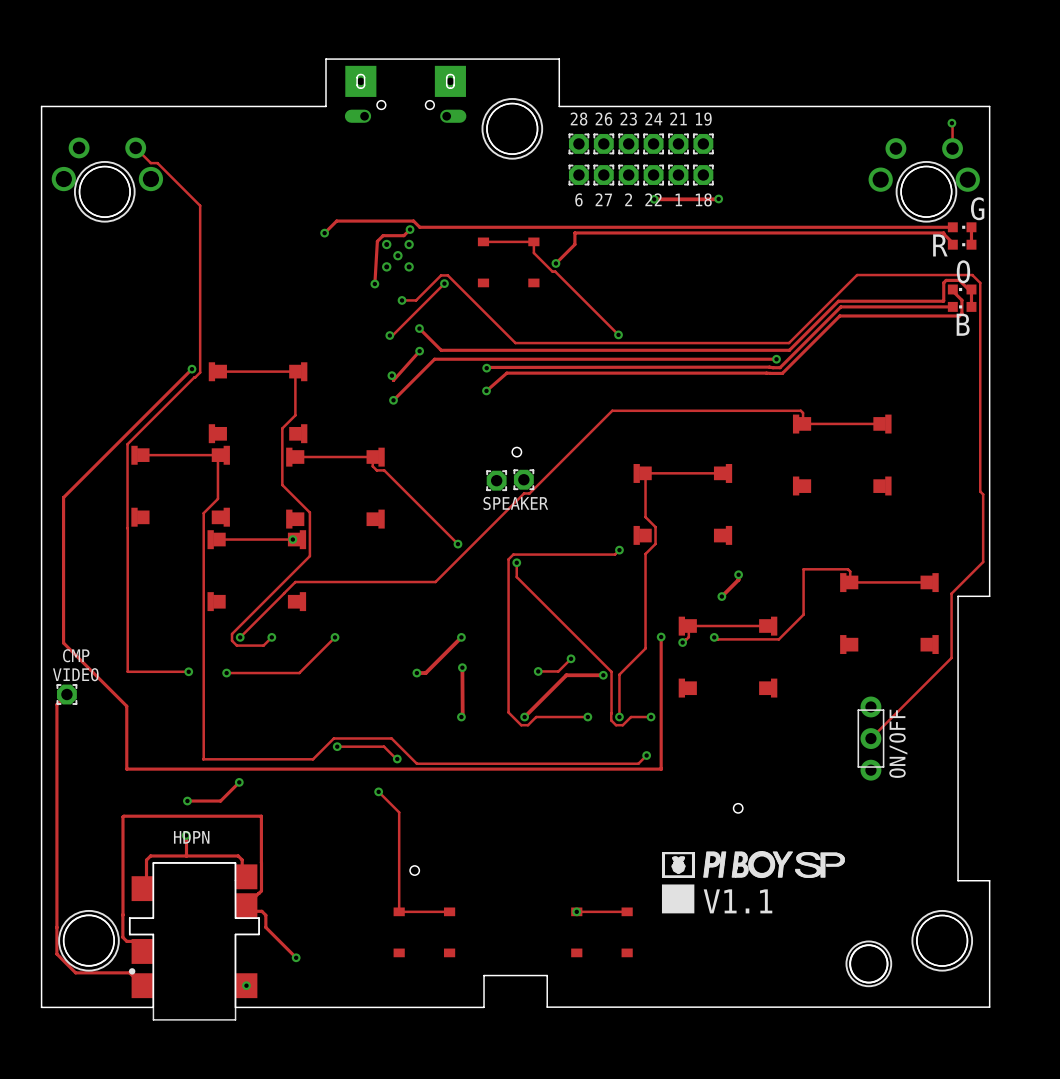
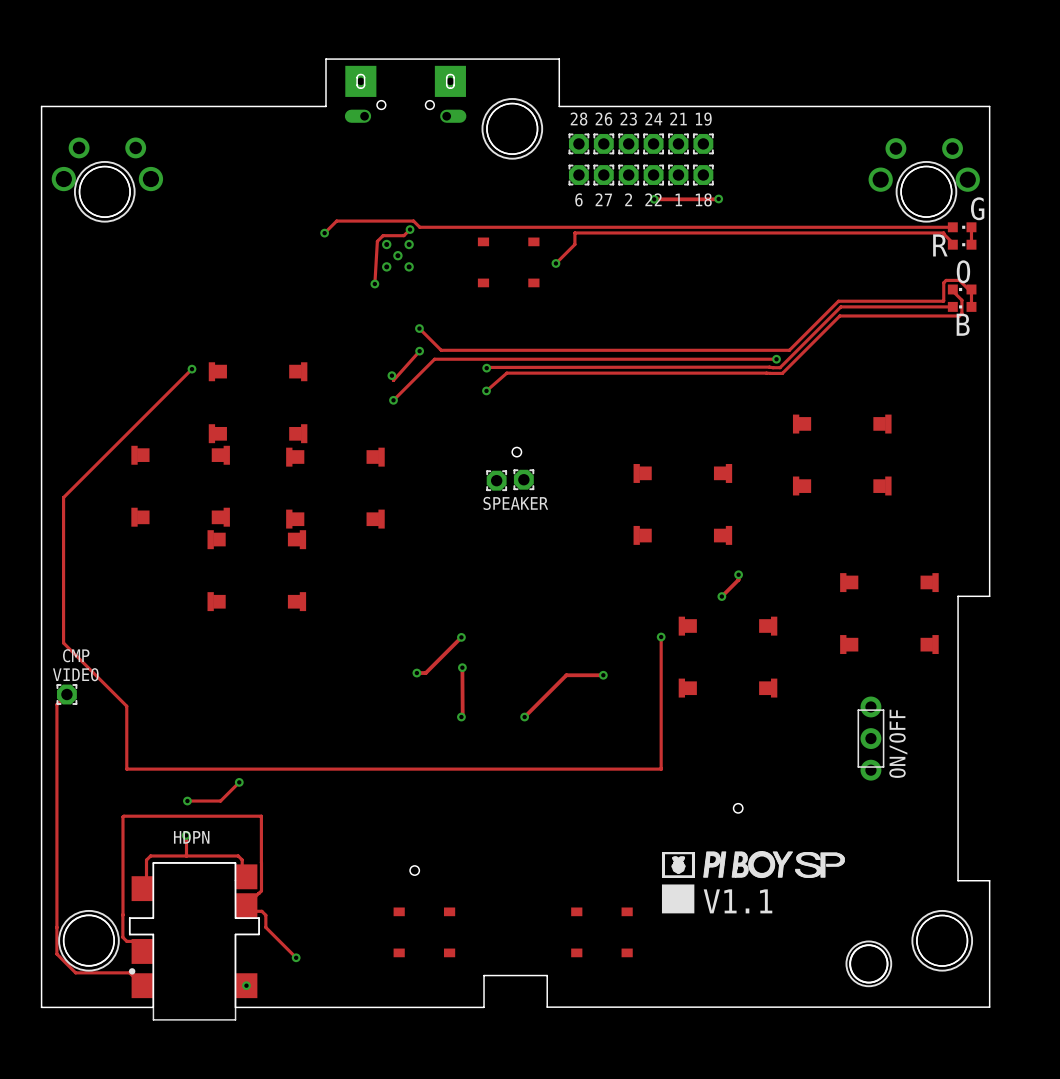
track: (951, 123) (952, 148) -> none
via: (951, 123) -> none
track: (135, 147) (150, 163) (157, 163) (200, 205) (200, 372) (127, 444) (127, 671) (188, 671) -> none
track: (483, 241) (533, 241) (533, 252) (618, 334) -> none
track: (444, 283) (392, 335) (389, 335) -> none
via: (444, 283) -> none
track: (402, 300) (416, 300) (441, 275) (447, 275) (515, 343) (789, 343) (857, 275) (972, 275) (980, 282) (980, 491) (983, 494) (983, 562) (951, 593) (951, 657) (870, 738) -> none
via: (402, 300) -> none
via: (618, 334) -> none
via: (389, 335) -> none
track: (220, 371) (295, 371) (295, 415) (282, 428) (282, 485) (309, 512) (309, 556) (232, 634) (232, 640) (236, 645) (263, 645) (271, 637) -> none
track: (879, 423) (804, 423) (800, 410) (612, 410) (529, 493) (524, 493) (435, 582) (295, 582) (284, 593) -> none
track: (143, 455) (217, 455) (217, 498) (203, 513) (203, 759) (313, 759) (333, 738) (391, 738) (416, 763) (638, 763) (646, 755) -> none
track: (298, 457) (372, 457) (372, 466) (376, 470) (384, 470) (457, 544) -> none
track: (720, 473) (645, 473) (645, 517) (655, 527) (655, 543) (645, 553) (645, 648) (619, 674) (619, 717) -> none
track: (219, 539) (294, 539) -> none
via: (292, 539) -> none
via: (457, 544) -> none
track: (619, 550) (615, 554) (513, 554) (508, 559) (508, 712) (521, 725) (528, 725) (536, 717) (587, 717) -> none
via: (619, 550) -> none
track: (516, 562) (516, 577) (611, 671) (611, 720) (616, 725) (622, 725) (631, 717) (651, 717) -> none
via: (516, 562) -> none
track: (926, 582) (852, 582) (848, 569) (803, 569) (803, 614) (778, 639) (717, 639) (714, 637) -> none
track: (284, 593) (240, 637) -> none
track: (765, 626) (690, 626) (688, 627) (688, 637) (682, 642) -> none
via: (240, 637) -> none
via: (271, 637) -> none
track: (335, 637) (299, 673) (226, 673) -> none
via: (335, 637) -> none
via: (714, 637) -> none
via: (682, 642) -> none
track: (571, 658) (558, 671) (538, 671) -> none
via: (571, 658) -> none
via: (188, 671) -> none
via: (538, 671) -> none
via: (226, 673) -> none
via: (587, 717) -> none
via: (619, 717) -> none
via: (651, 717) -> none
track: (337, 746) (384, 746) (397, 759) -> none
via: (337, 746) -> none
via: (646, 755) -> none
via: (397, 759) -> none
track: (378, 791) (399, 812) (399, 911) (449, 911) -> none
via: (378, 791) -> none
track: (576, 911) (627, 911) -> none
via: (576, 911) -> none

